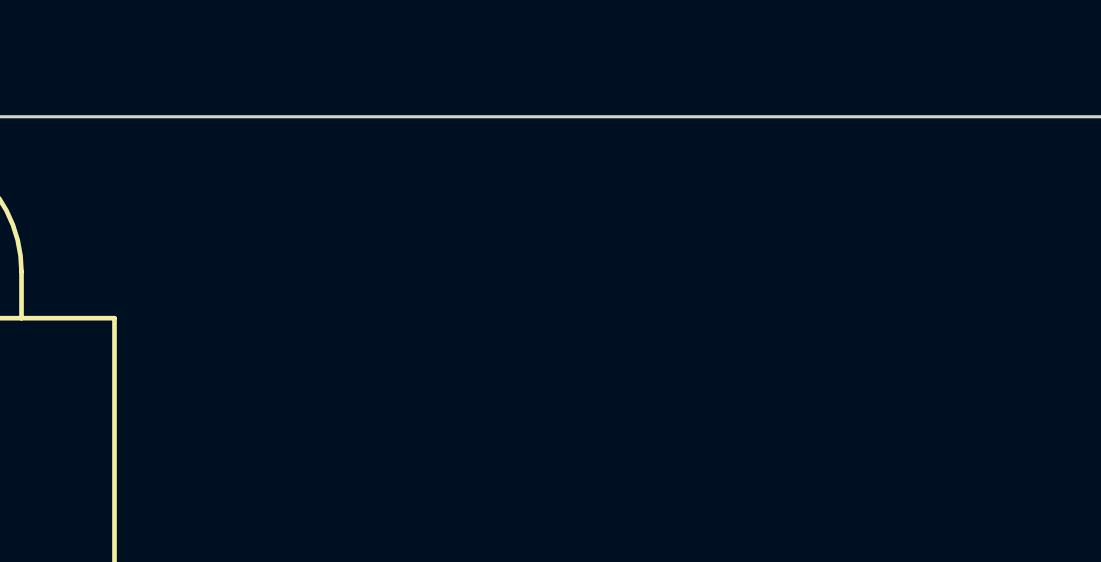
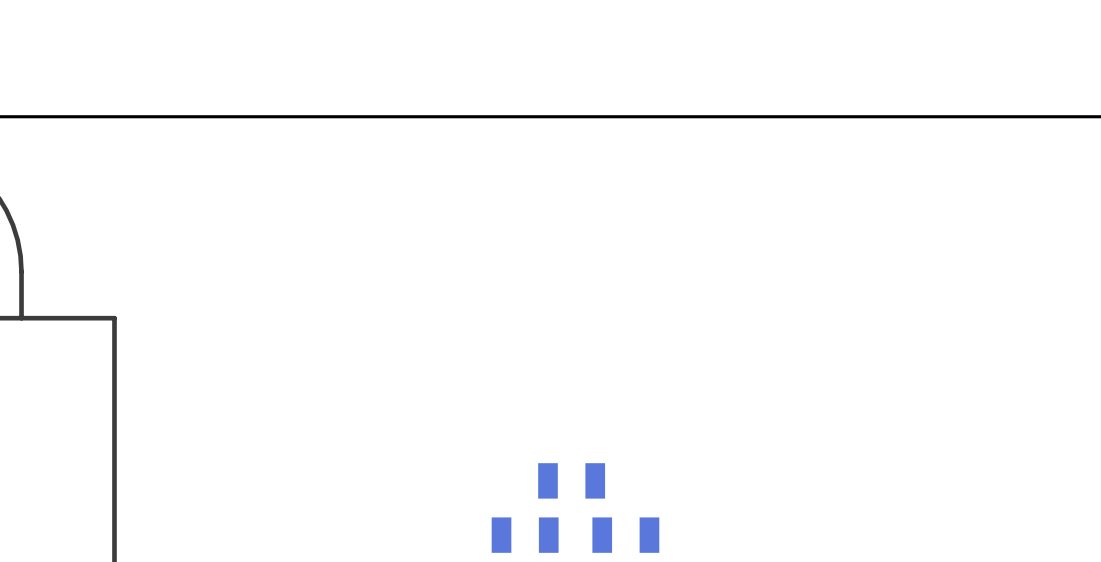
part: none -> (571, 480)
part: none -> (525, 535)
part: none -> (625, 535)

